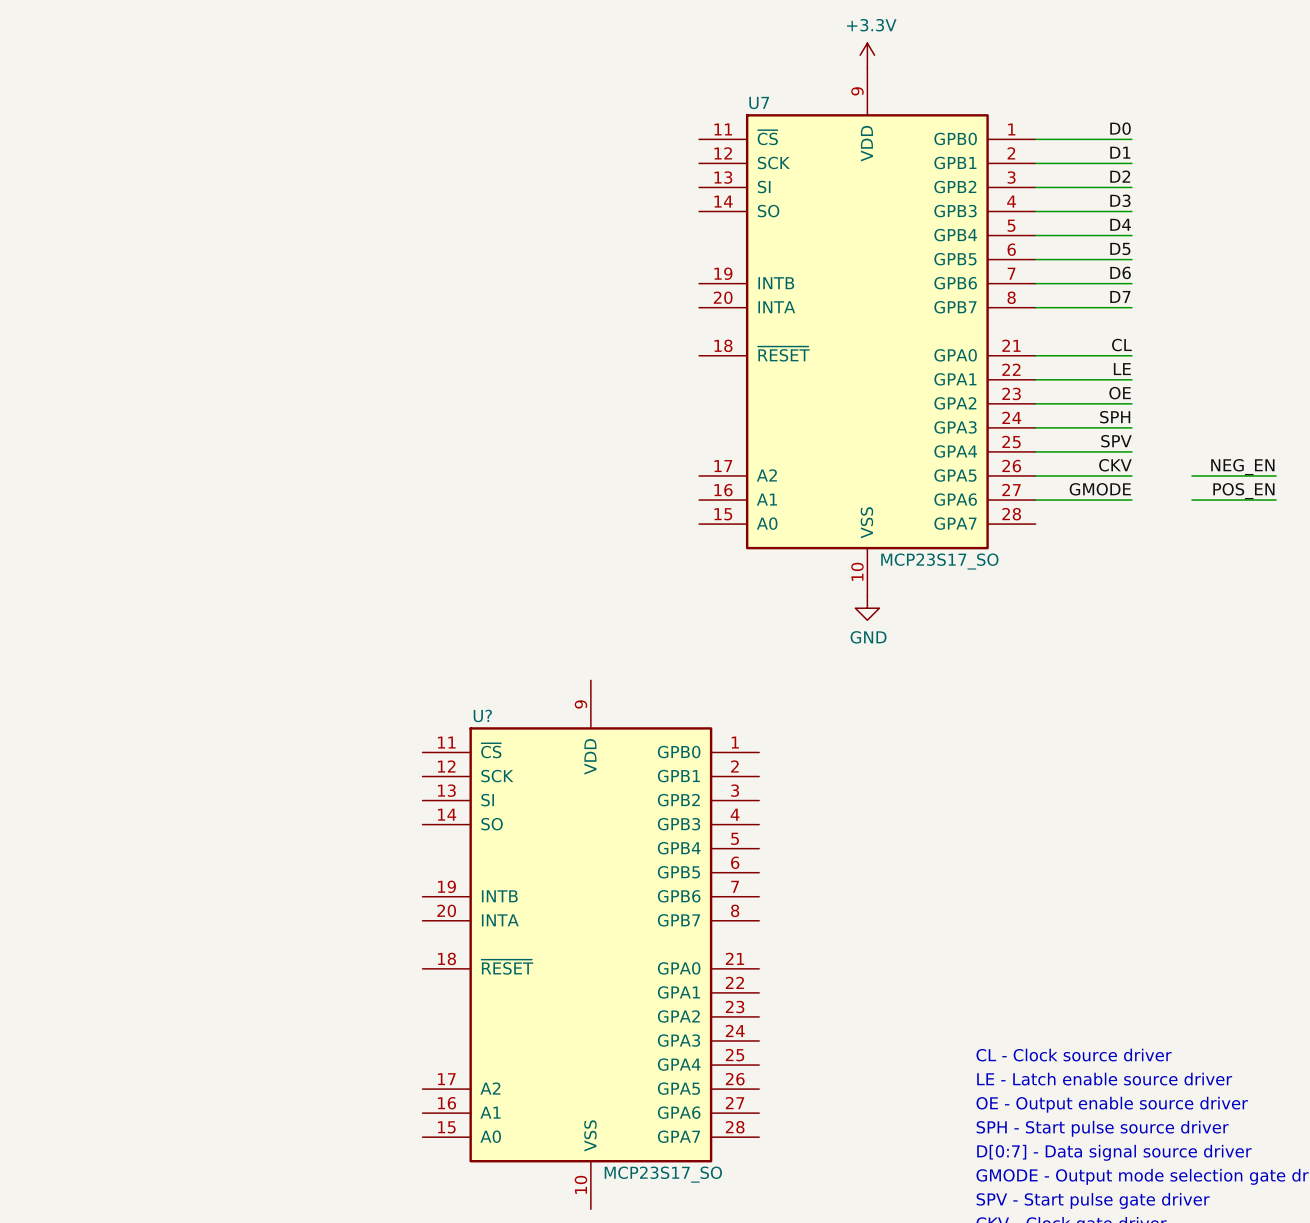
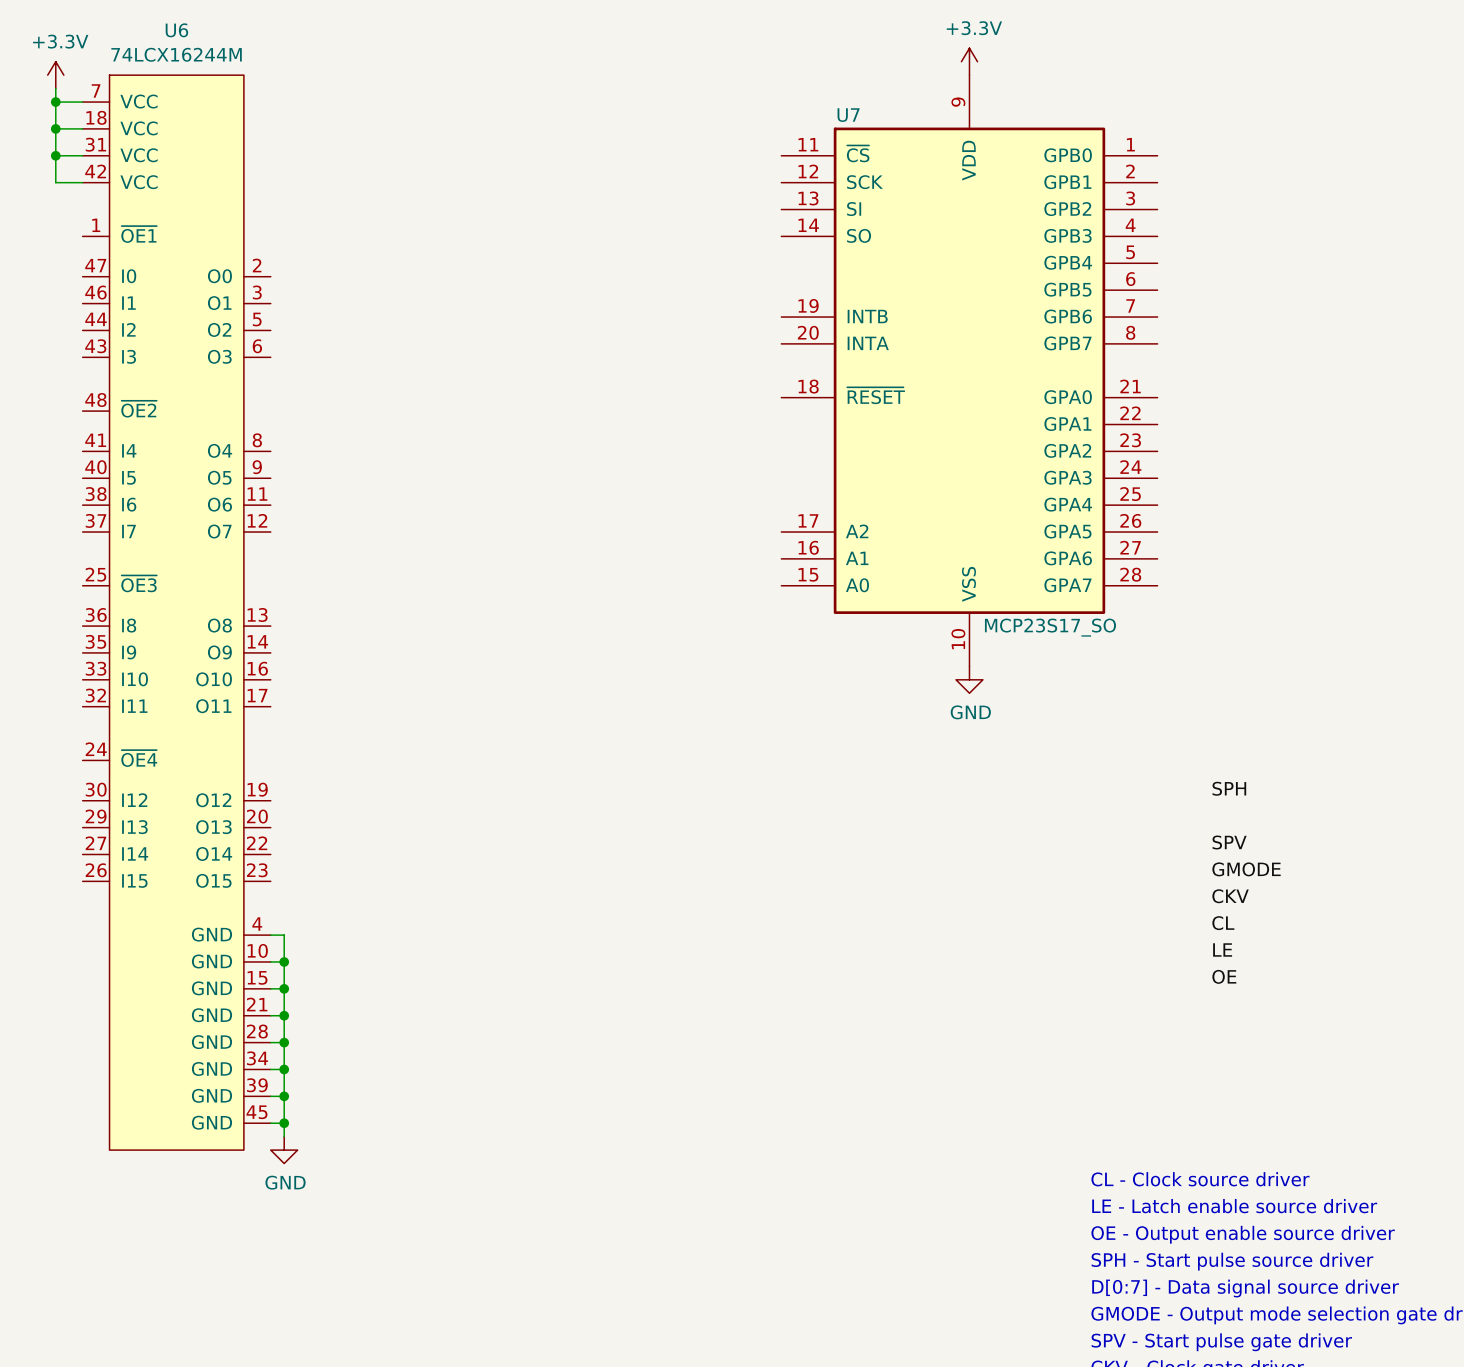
power symbol: none -> +3.3V (55, 75)
wire: none -> (55, 88) (55, 182) (82, 182)
wire: none -> (55, 102) (82, 102)
junction: none -> (55, 102)
wire: none -> (55, 128) (82, 128)
junction: none -> (55, 128)
label: D0 (1120, 128) -> none
wire: none -> (55, 155) (82, 155)
junction: none -> (55, 155)
wire: (1035, 139) (1131, 139) -> none
label: D1 (1120, 152) -> none
wire: (1035, 163) (1131, 163) -> none
label: D2 (1120, 176) -> none
wire: (1035, 187) (1131, 187) -> none
label: D3 (1120, 200) -> none
wire: (1035, 211) (1131, 211) -> none
label: D4 (1120, 224) -> none
wire: (1035, 235) (1131, 235) -> none
label: D5 (1120, 248) -> none
wire: (1035, 259) (1131, 259) -> none
label: D6 (1120, 272) -> none
wire: (1035, 283) (1131, 283) -> none
label: D7 (1120, 296) -> none
wire: (1035, 307) (1131, 307) -> none
label: CL (1121, 345) -> none
wire: (1035, 355) (1131, 355) -> none
label: LE (1122, 369) -> none
wire: (1035, 379) (1131, 379) -> none
label: OE (1120, 393) -> none
wire: (1035, 403) (1131, 403) -> none
label: SPH (1115, 417) -> none
wire: (1035, 427) (1131, 427) -> none
label: SPV (1116, 441) -> none
wire: (1035, 451) (1131, 451) -> none
label: CKV (1115, 465) -> none
label: NEG_EN (1242, 467) -> none
wire: (1035, 475) (1131, 475) -> none
wire: (1191, 475) (1276, 475) -> none
label: GMODE (1100, 489) -> none
label: POS_EN (1243, 491) -> none
wire: (1035, 500) (1131, 500) -> none
wire: (1191, 500) (1276, 500) -> none
U6: none -> 74LCX16244M (176, 612)
label: none -> SPH (1229, 788)
label: none -> SPV (1229, 842)
label: none -> GMODE (1246, 869)
label: none -> CKV (1230, 896)
label: none -> CL (1223, 923)
wire: none -> (270, 935) (284, 935) (284, 1136)
label: none -> LE (1222, 949)
wire: none -> (270, 961) (284, 961)
junction: none -> (284, 961)
label: none -> OE (1224, 976)
wire: none -> (270, 988) (284, 988)
junction: none -> (284, 988)
wire: none -> (270, 1015) (284, 1015)
junction: none -> (284, 1015)
wire: none -> (270, 1042) (284, 1042)
junction: none -> (284, 1042)
U?: MCP23S17_SO (590, 944) -> none
wire: none -> (270, 1069) (284, 1069)
junction: none -> (284, 1069)
wire: none -> (270, 1096) (284, 1096)
junction: none -> (284, 1096)
wire: none -> (270, 1123) (284, 1123)
junction: none -> (284, 1123)
power symbol: none -> GND (284, 1150)

